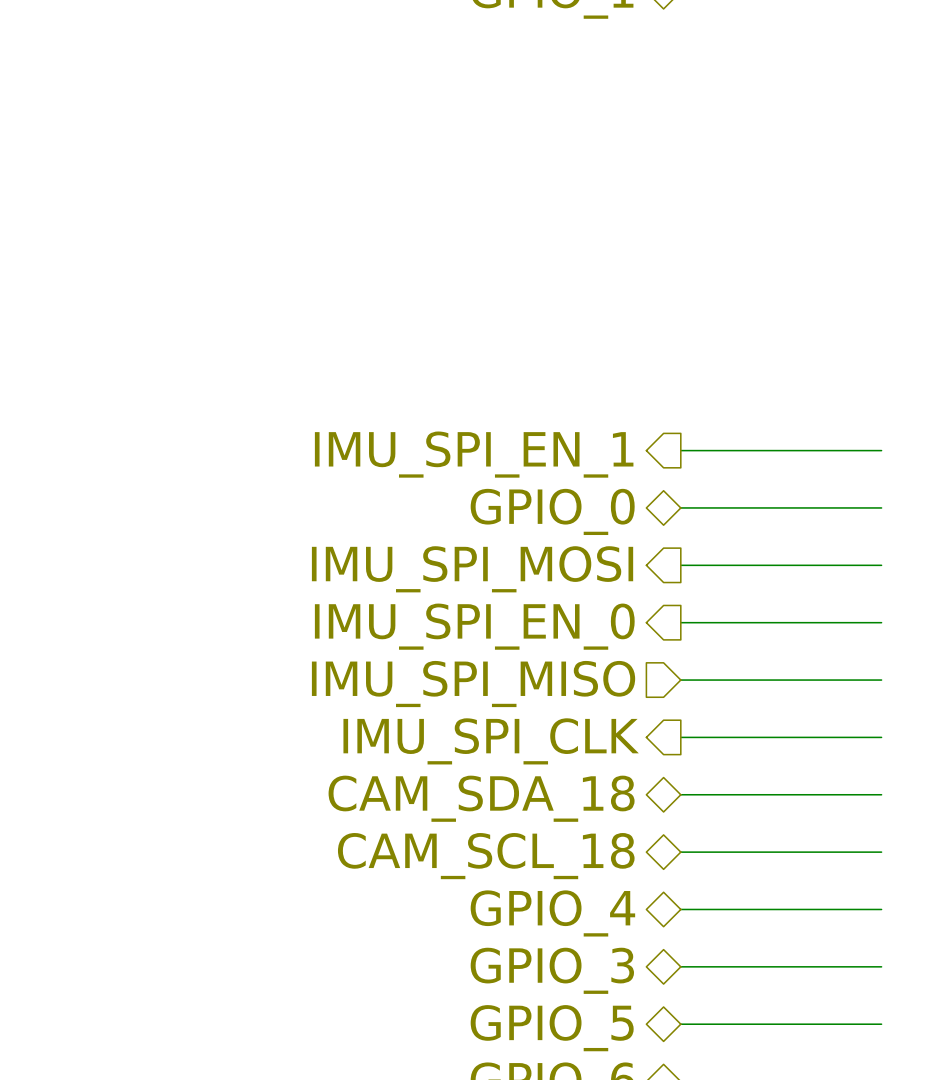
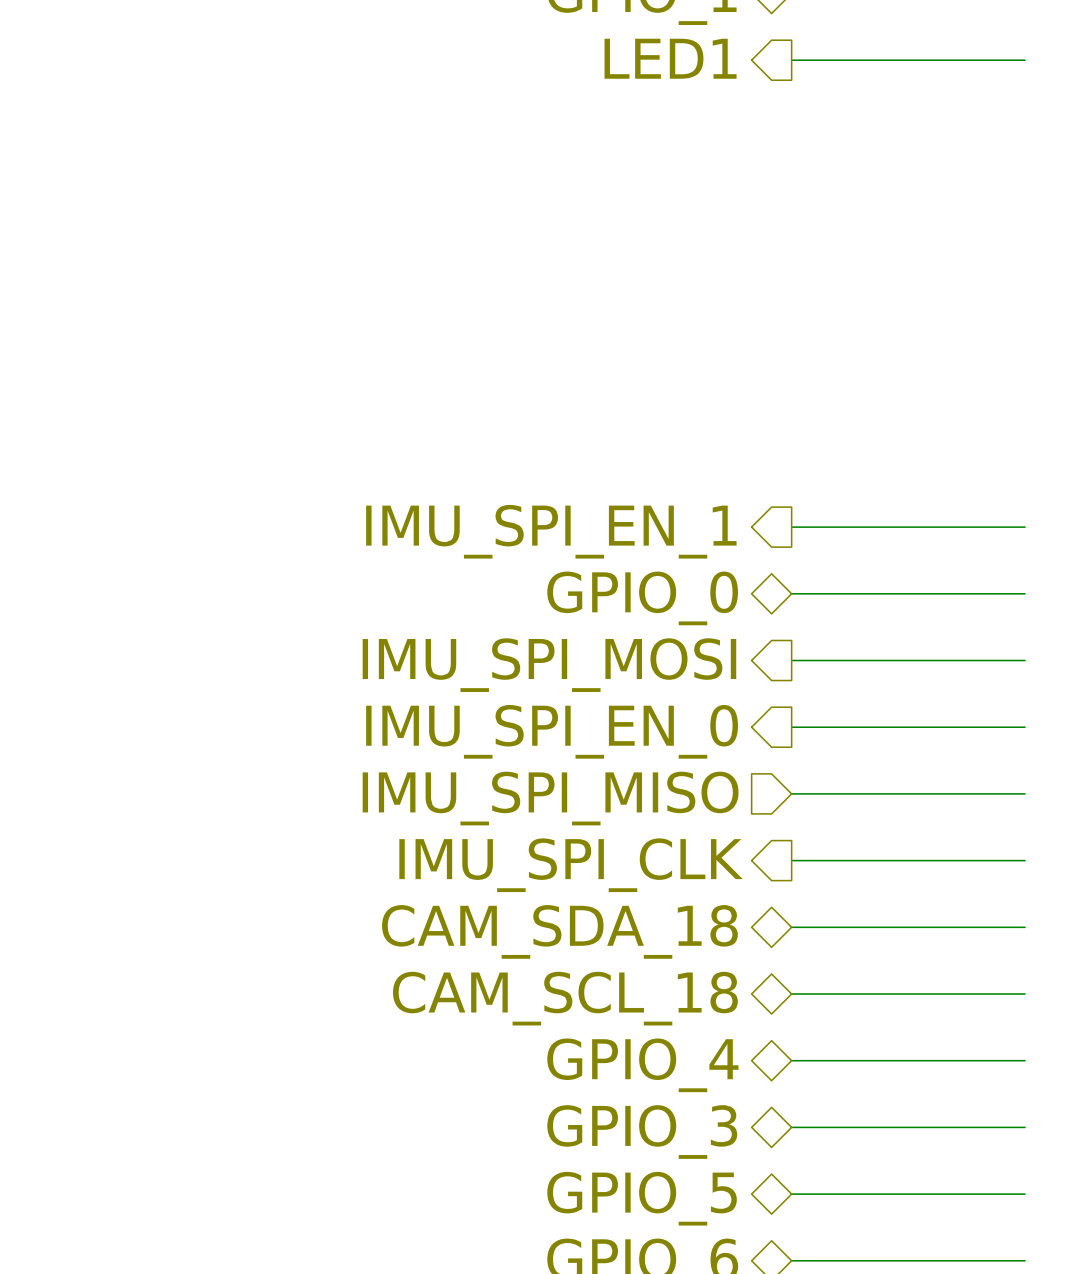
hierarchical label: none -> LED1 (670, 58)
wire: none -> (791, 60) (1025, 60)

